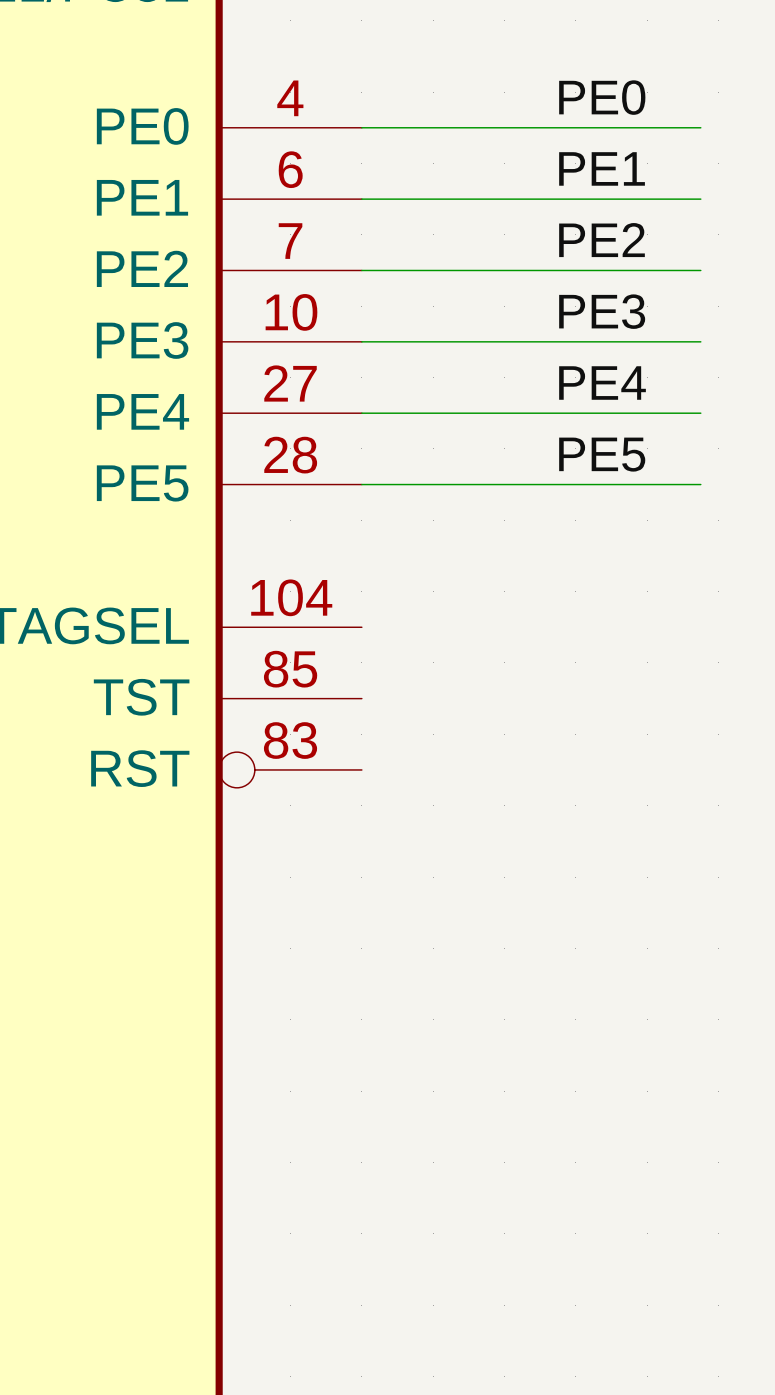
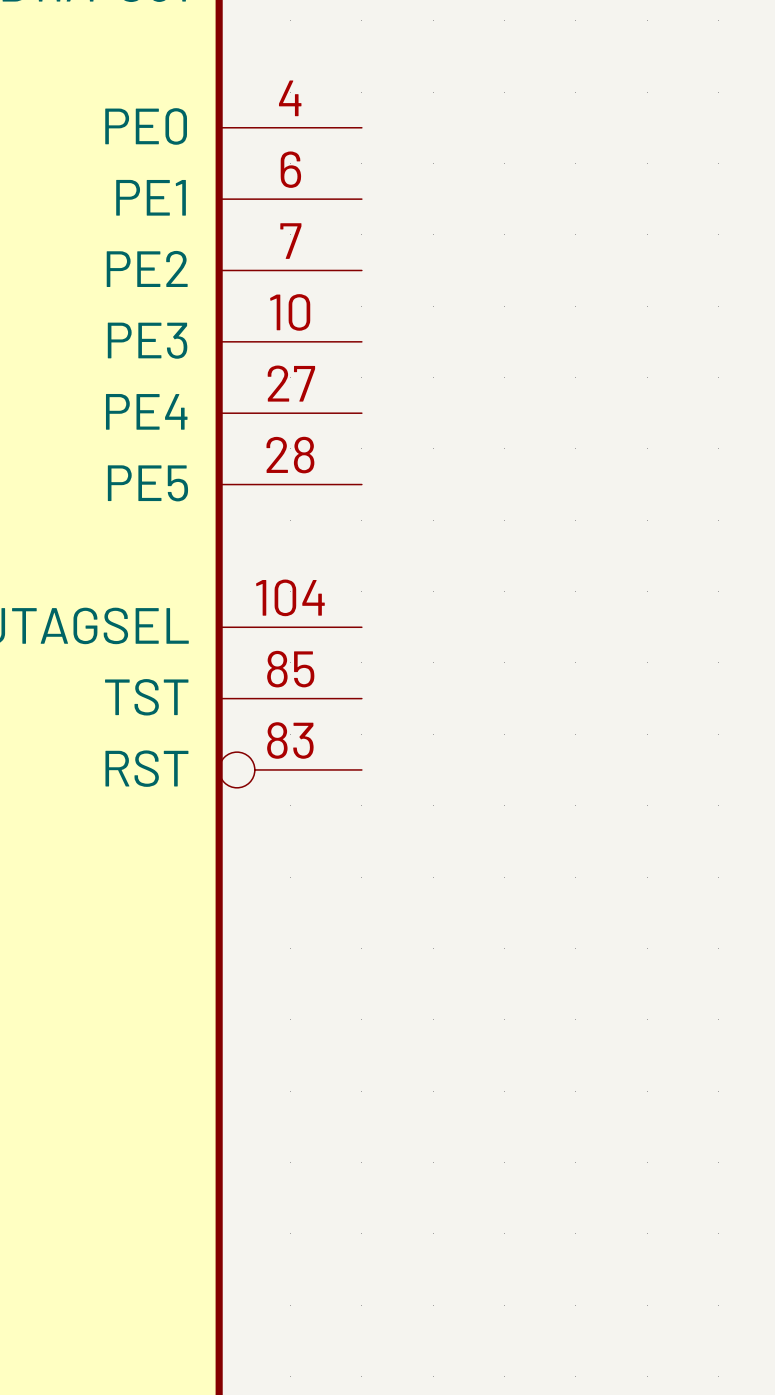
label: PE0 (602, 97) -> none
wire: (361, 127) (700, 127) -> none
label: PE1 (602, 168) -> none
wire: (361, 199) (700, 199) -> none
label: PE2 (602, 240) -> none
wire: (361, 270) (700, 270) -> none
label: PE3 (602, 311) -> none
wire: (361, 341) (700, 341) -> none
label: PE4 (602, 383) -> none
wire: (361, 413) (700, 413) -> none
label: PE5 (602, 454) -> none
wire: (361, 484) (700, 484) -> none

